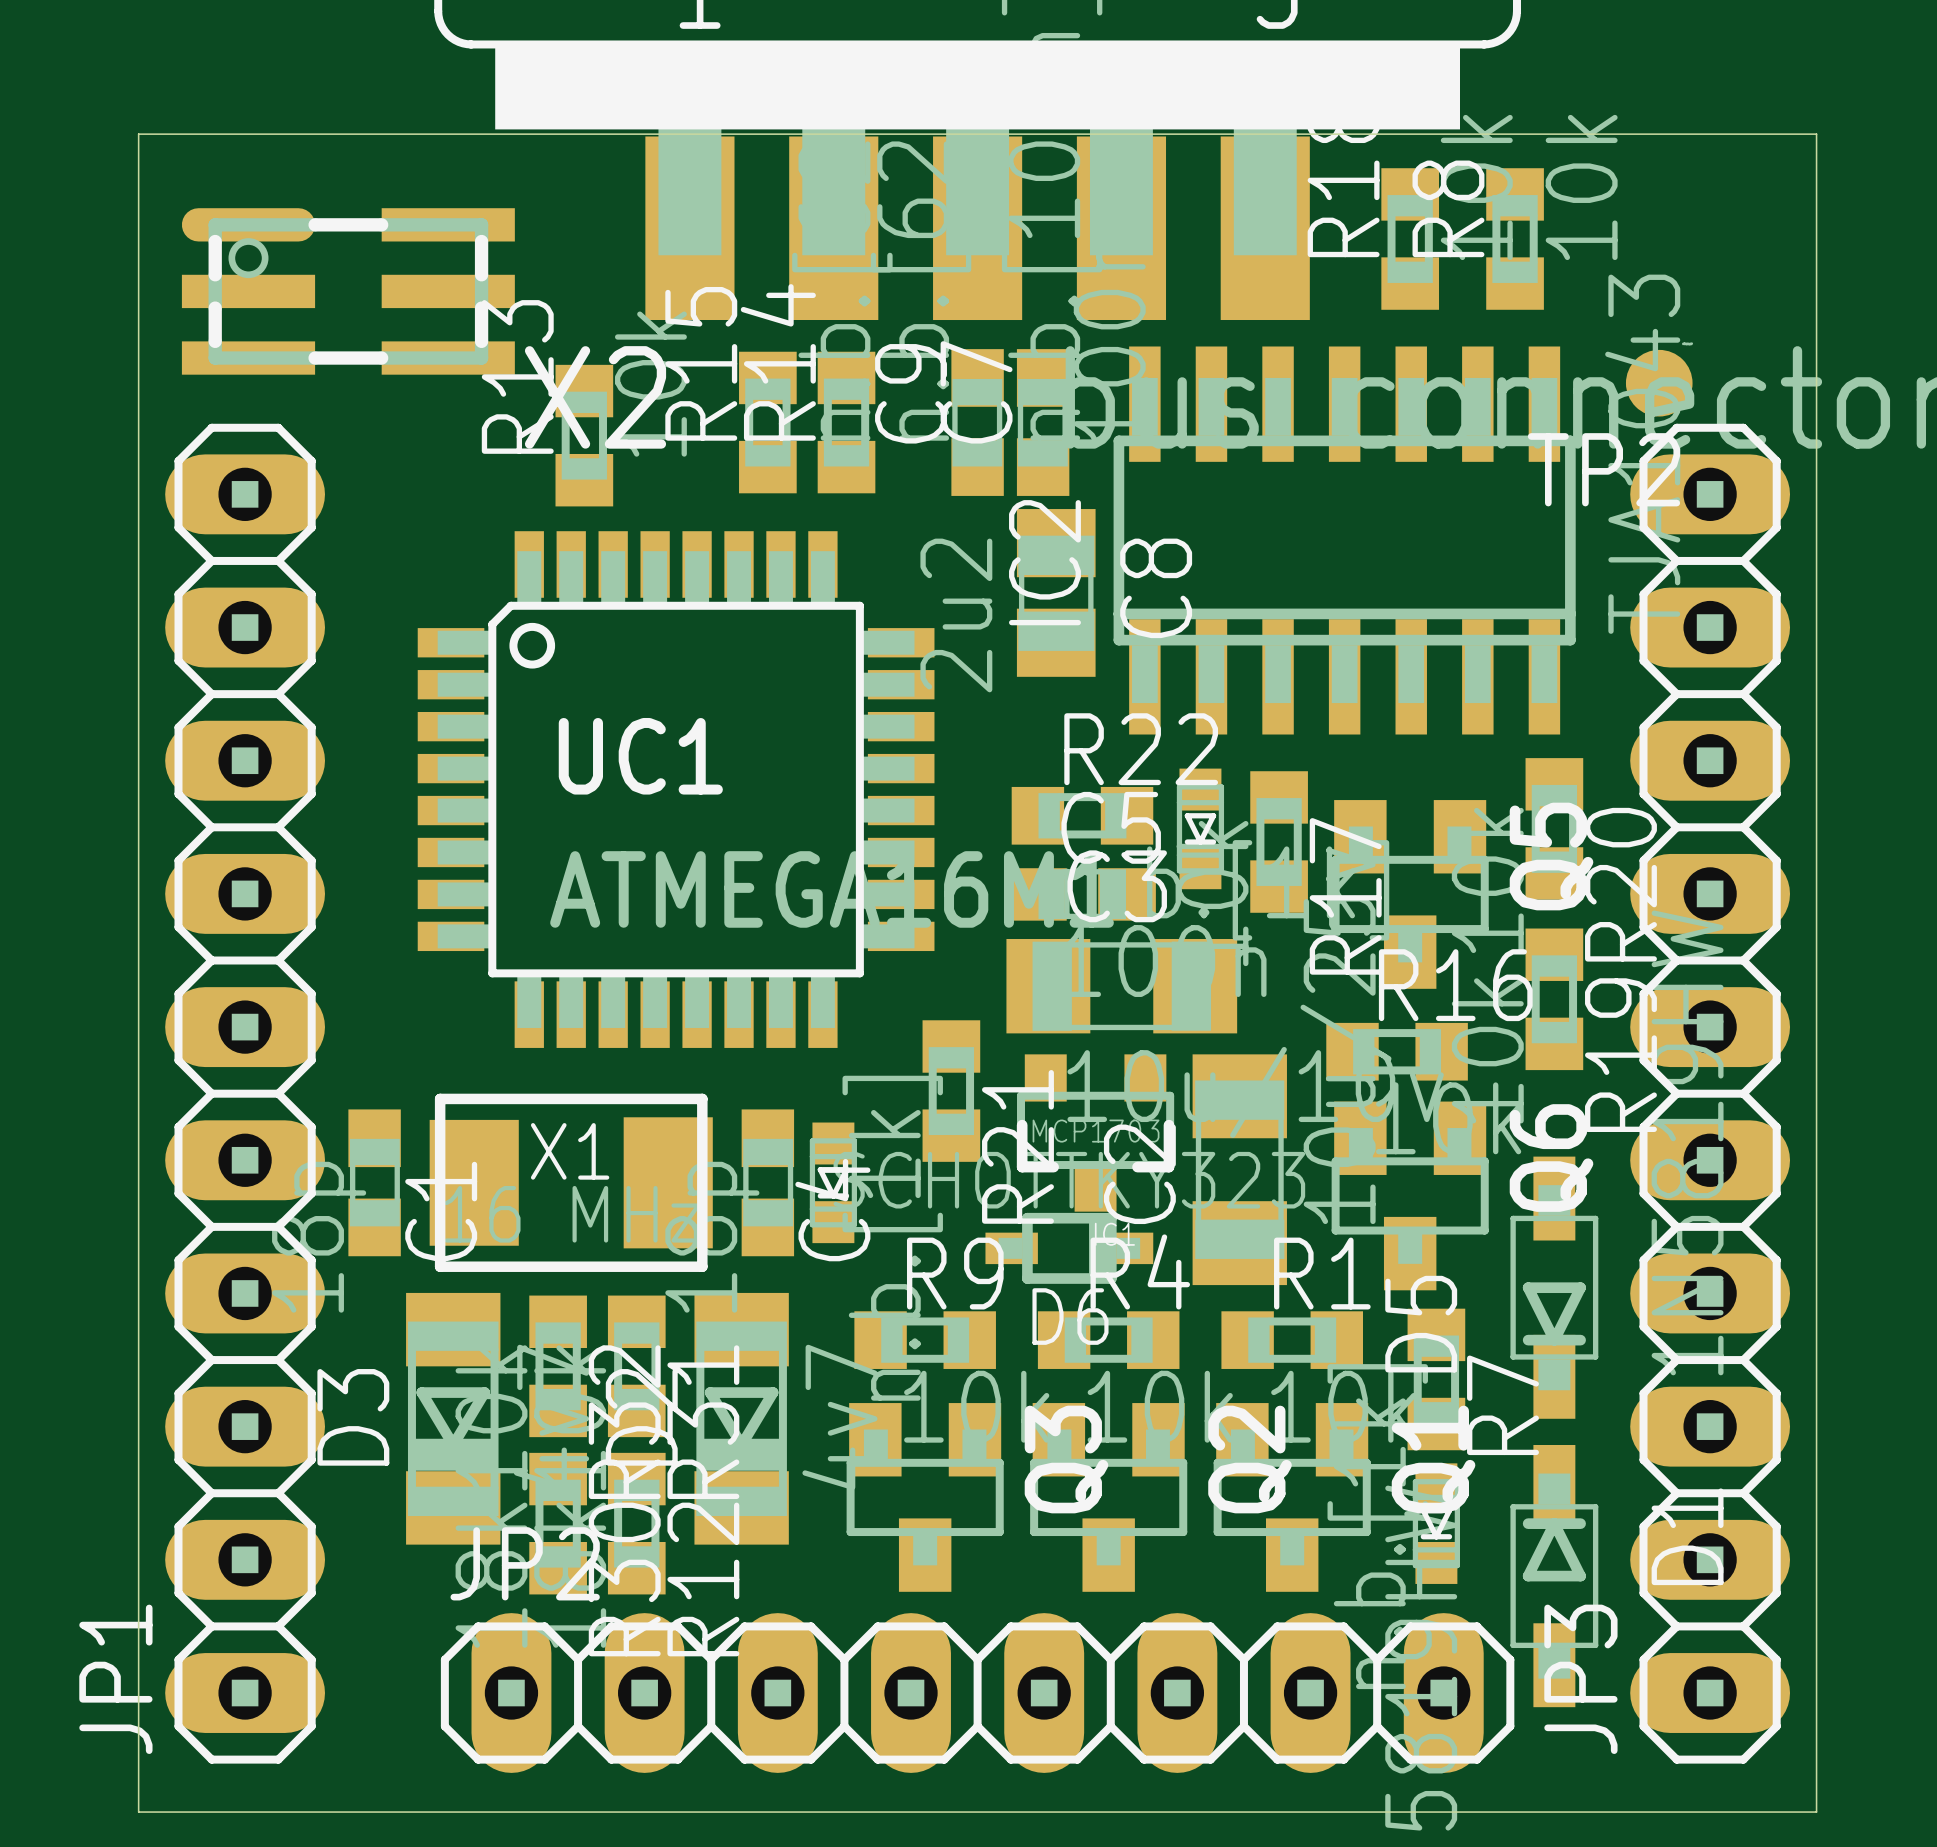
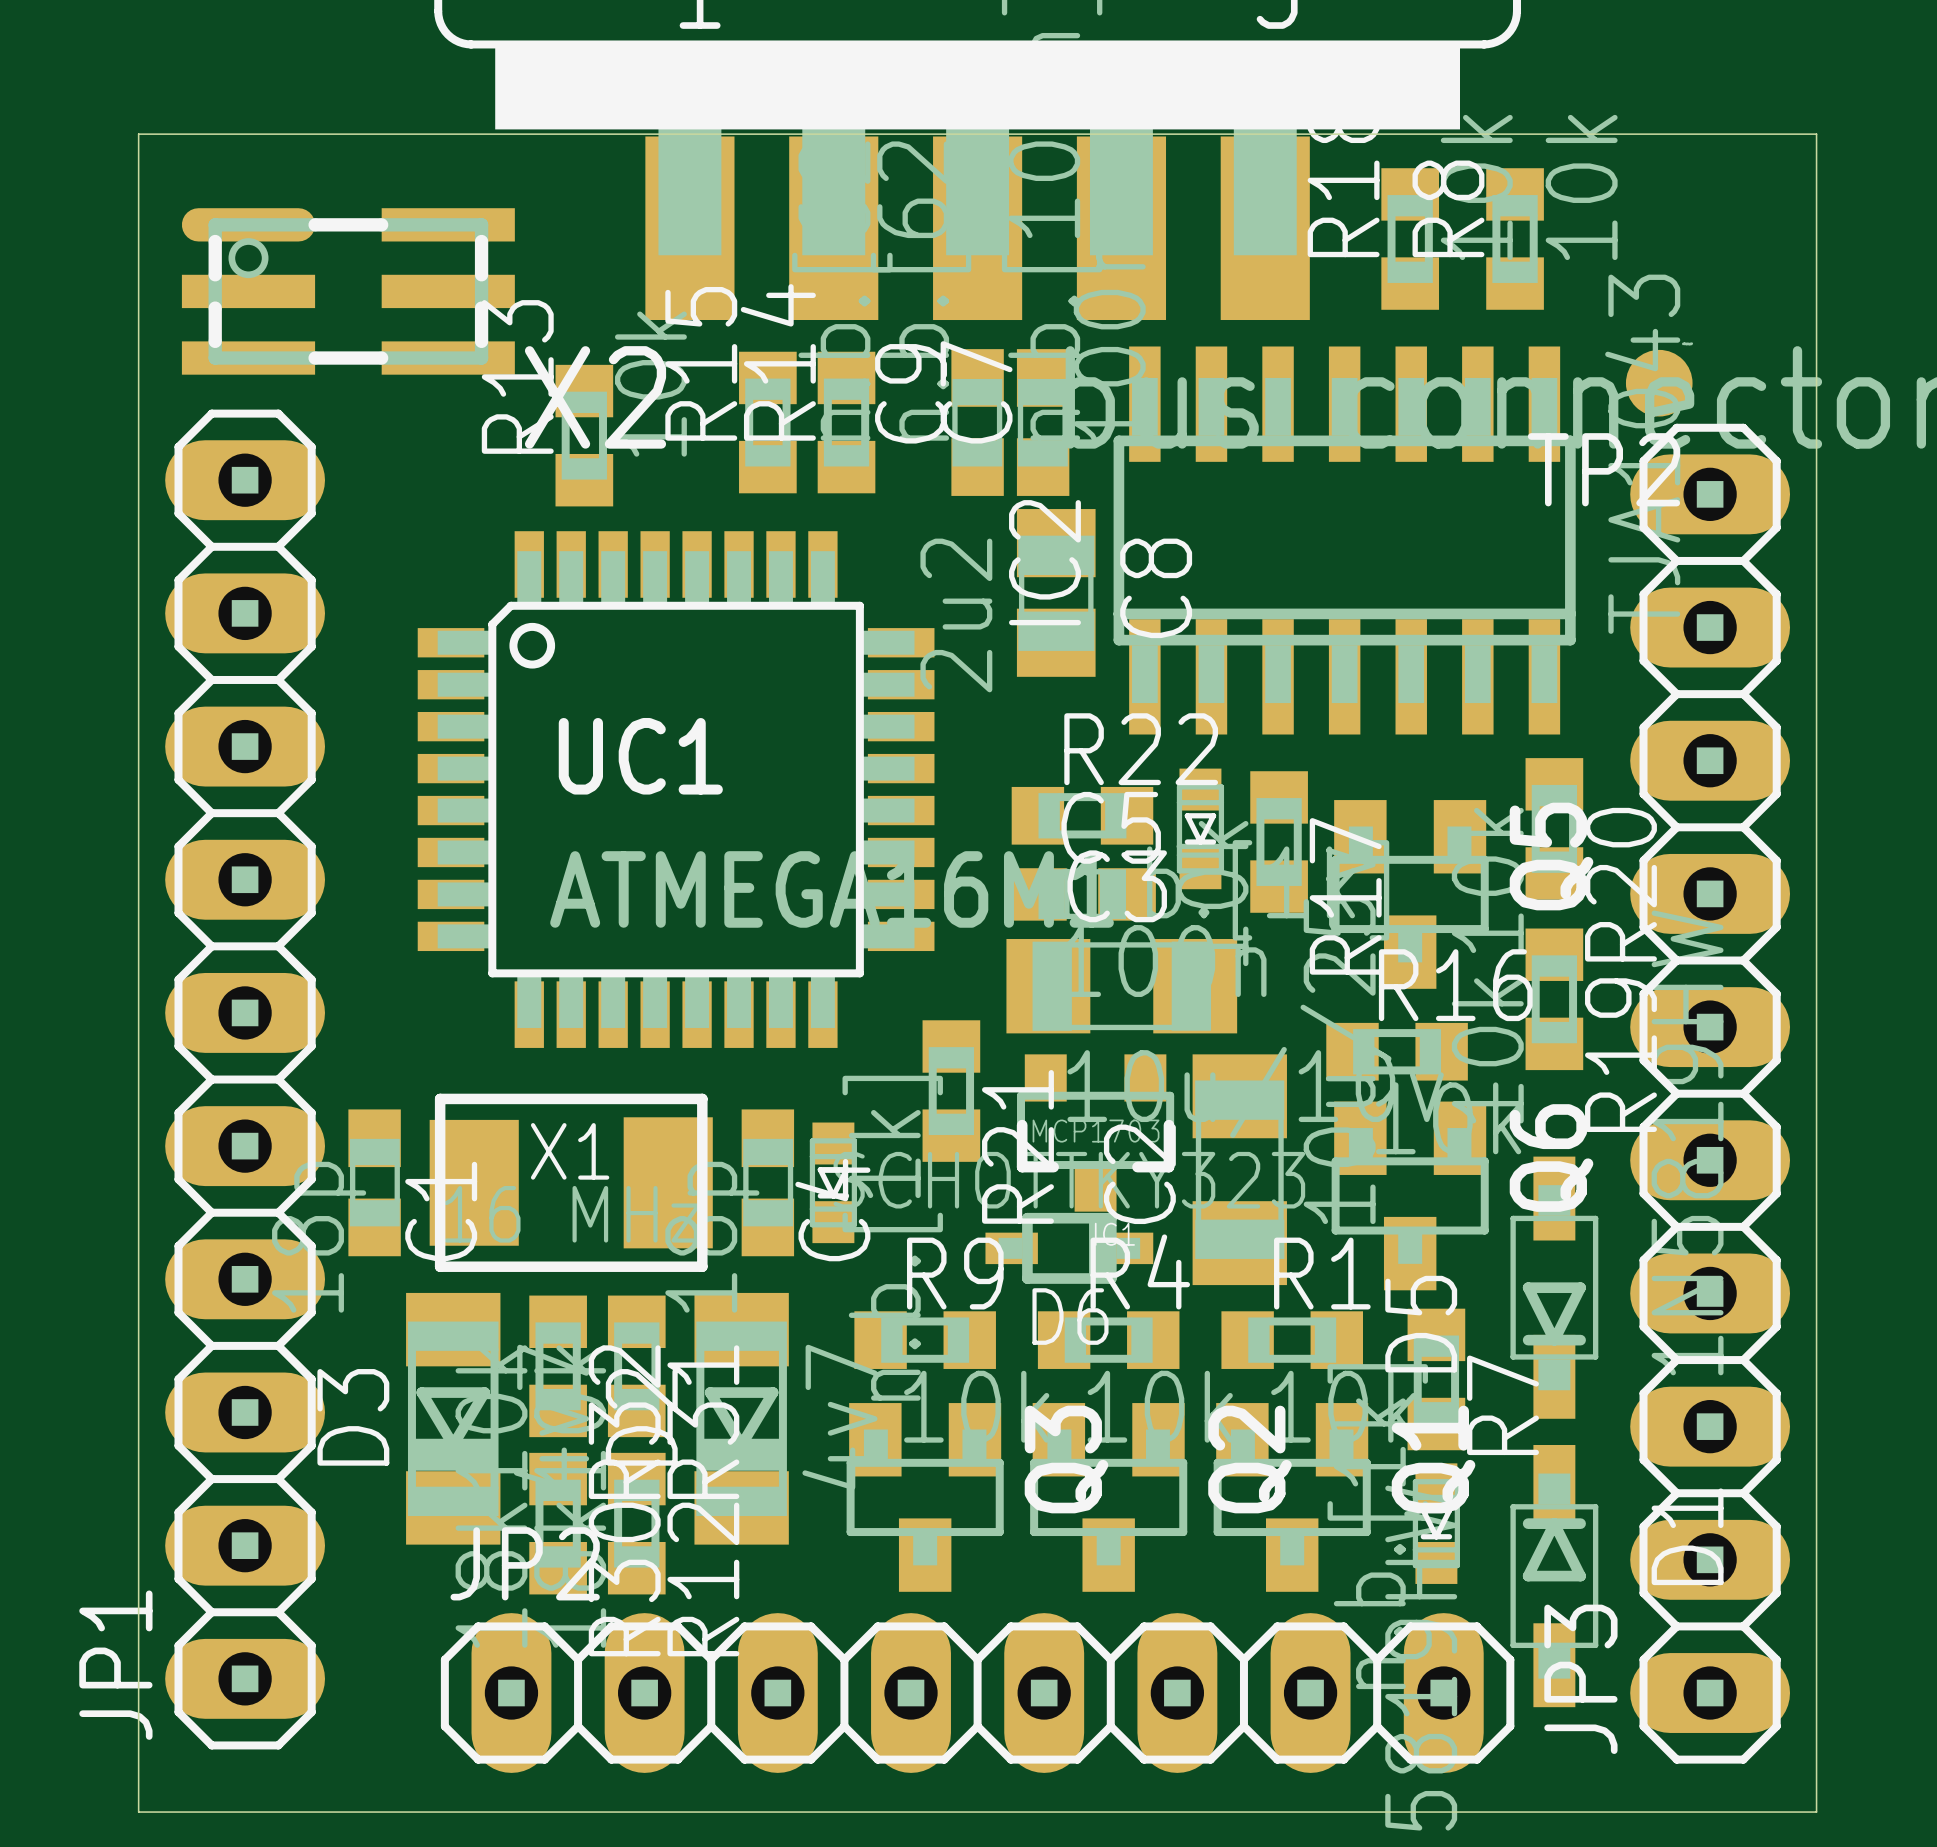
JP1 position: (245, 1093) -> (245, 1079)

